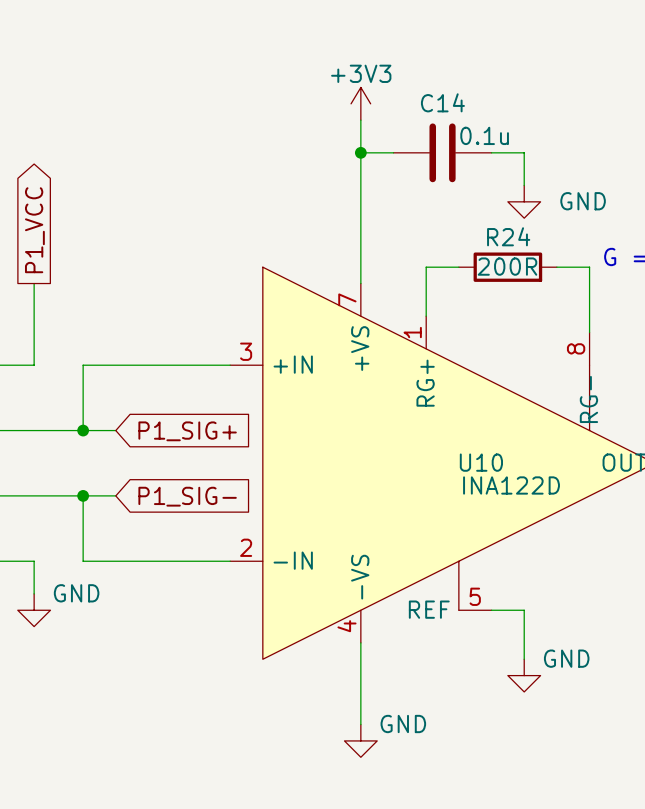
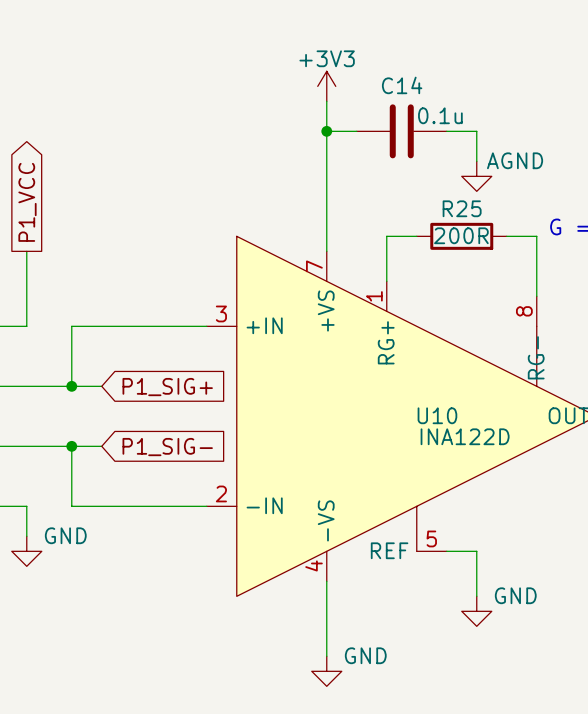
power symbol: GND (524, 201) -> AGND (476, 176)
R24 name: R24 (508, 236) -> R25 (462, 208)

